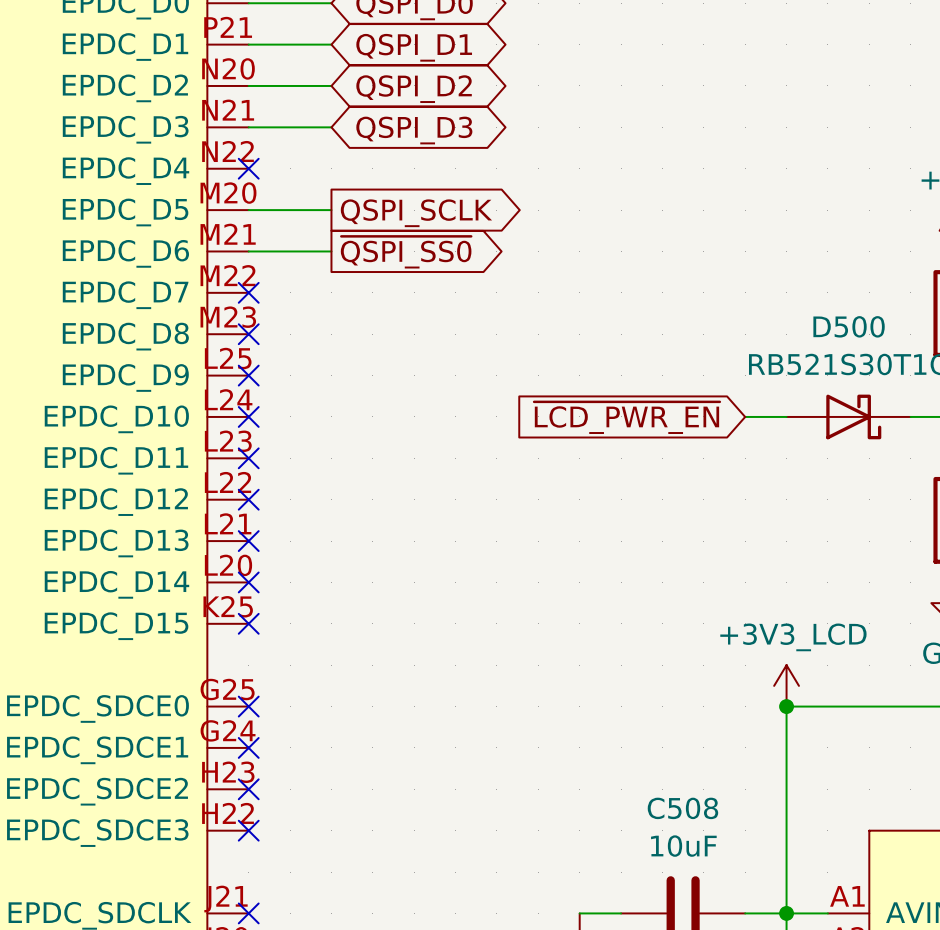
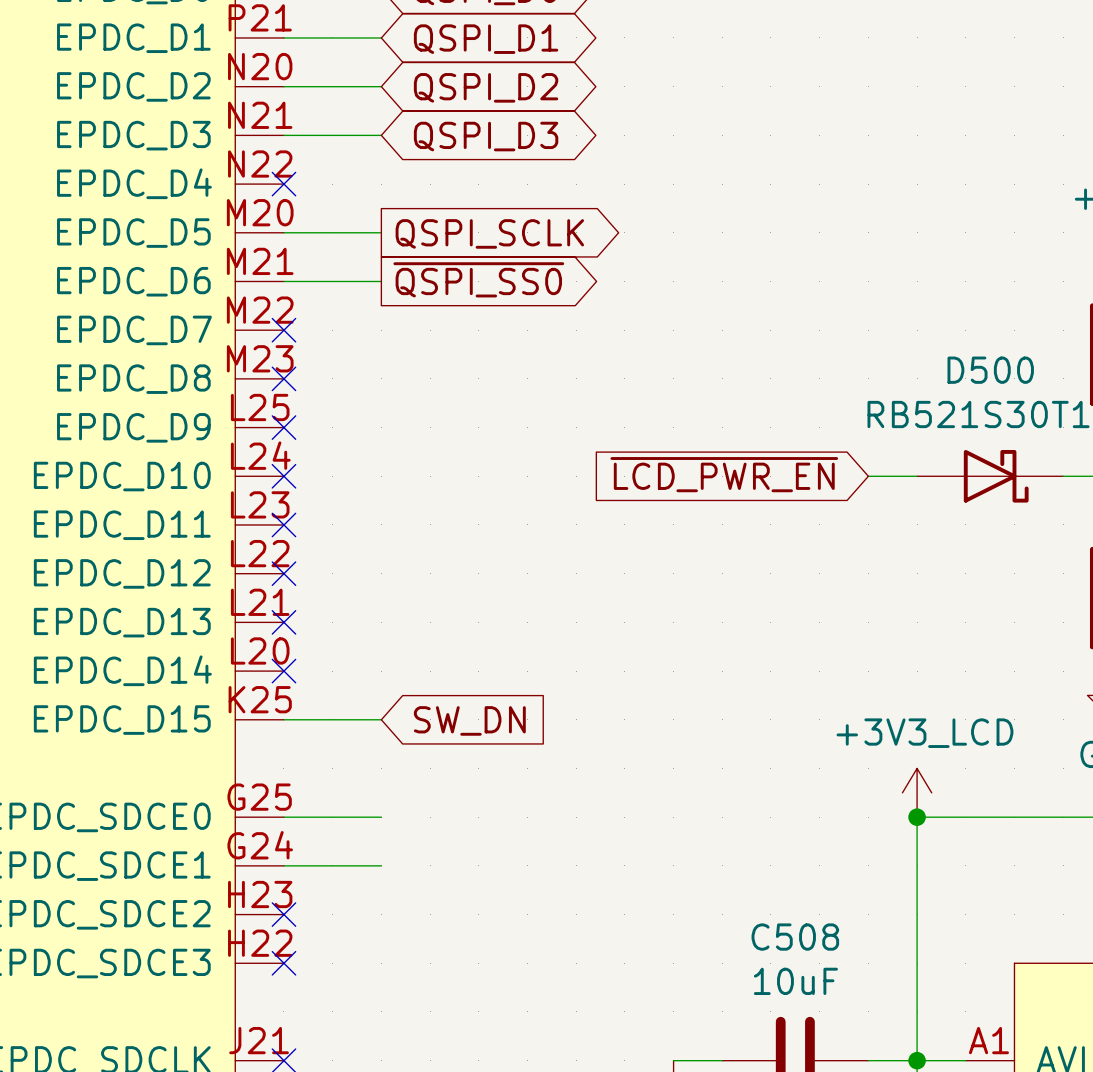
wire: none -> (283, 719) (381, 719)
no-connect mark: (248, 623) -> none
global label: none -> SW_DN (469, 720)
wire: none -> (283, 817) (381, 817)
no-connect mark: (248, 706) -> none
wire: none -> (283, 865) (381, 865)
no-connect mark: (248, 747) -> none

